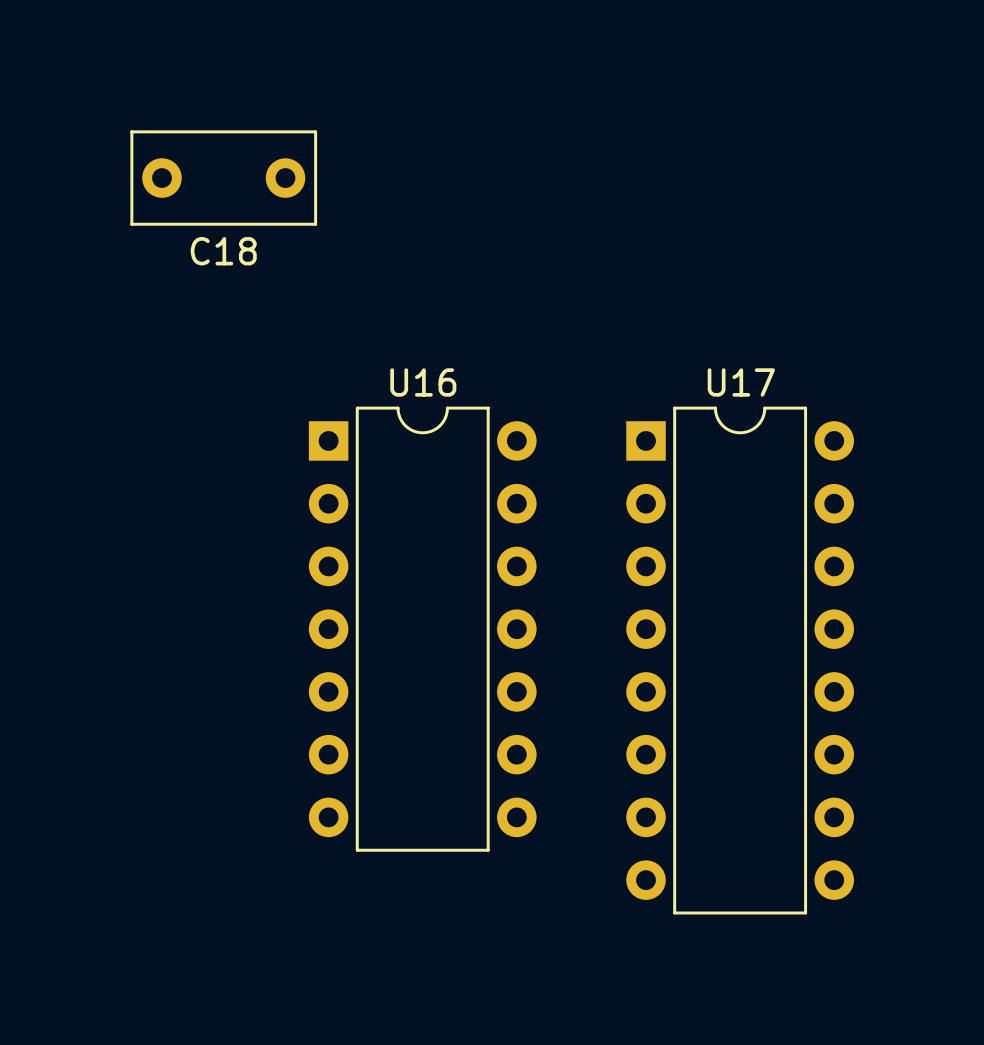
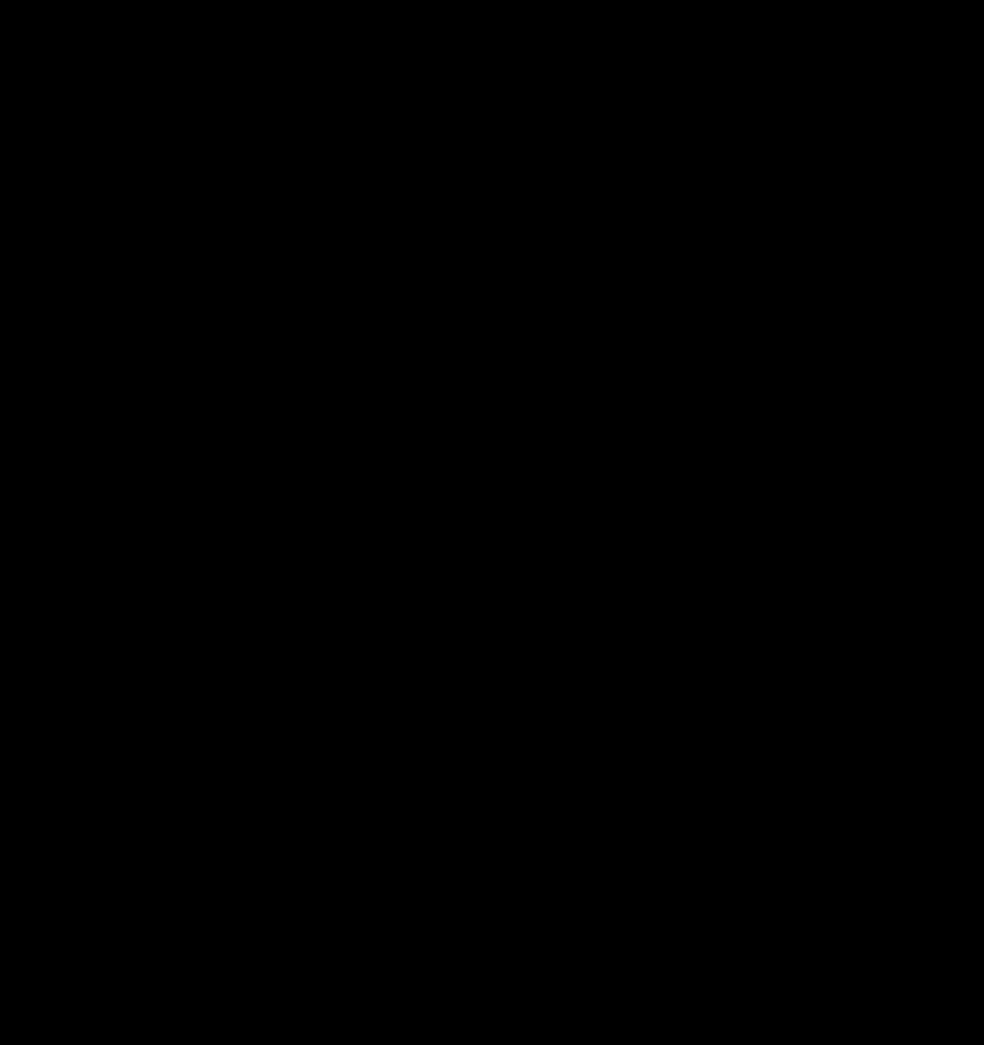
C18: (223, 178) -> none
U16: (422, 629) -> none
U17: (740, 660) -> none

